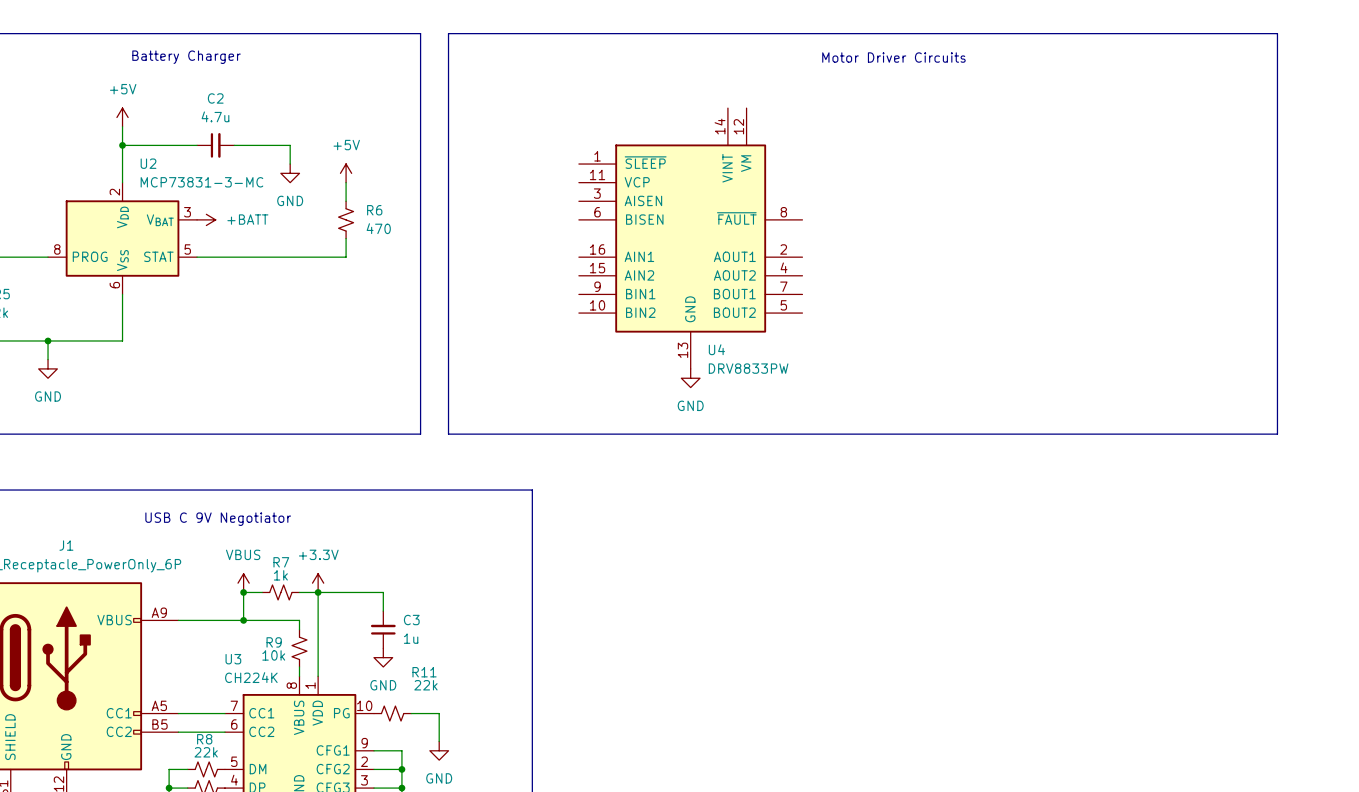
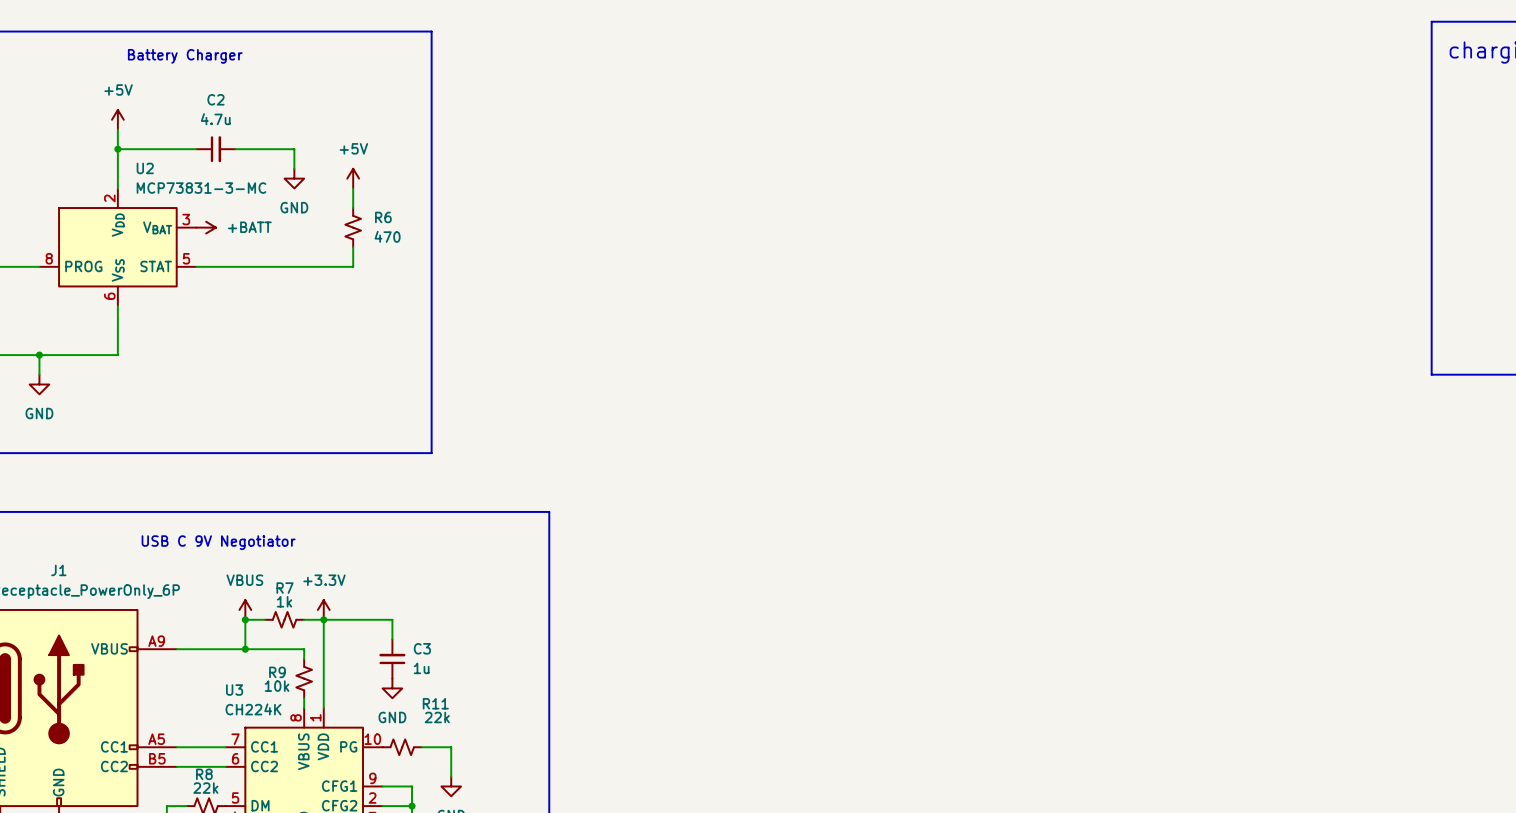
line: (448, 33) (1277, 33) (1277, 434) (448, 434) (448, 33) -> none
text: Motor Driver Circuits (893, 57) -> none
U4: DRV8833PW (690, 238) -> none
power symbol: GND (690, 378) -> none

